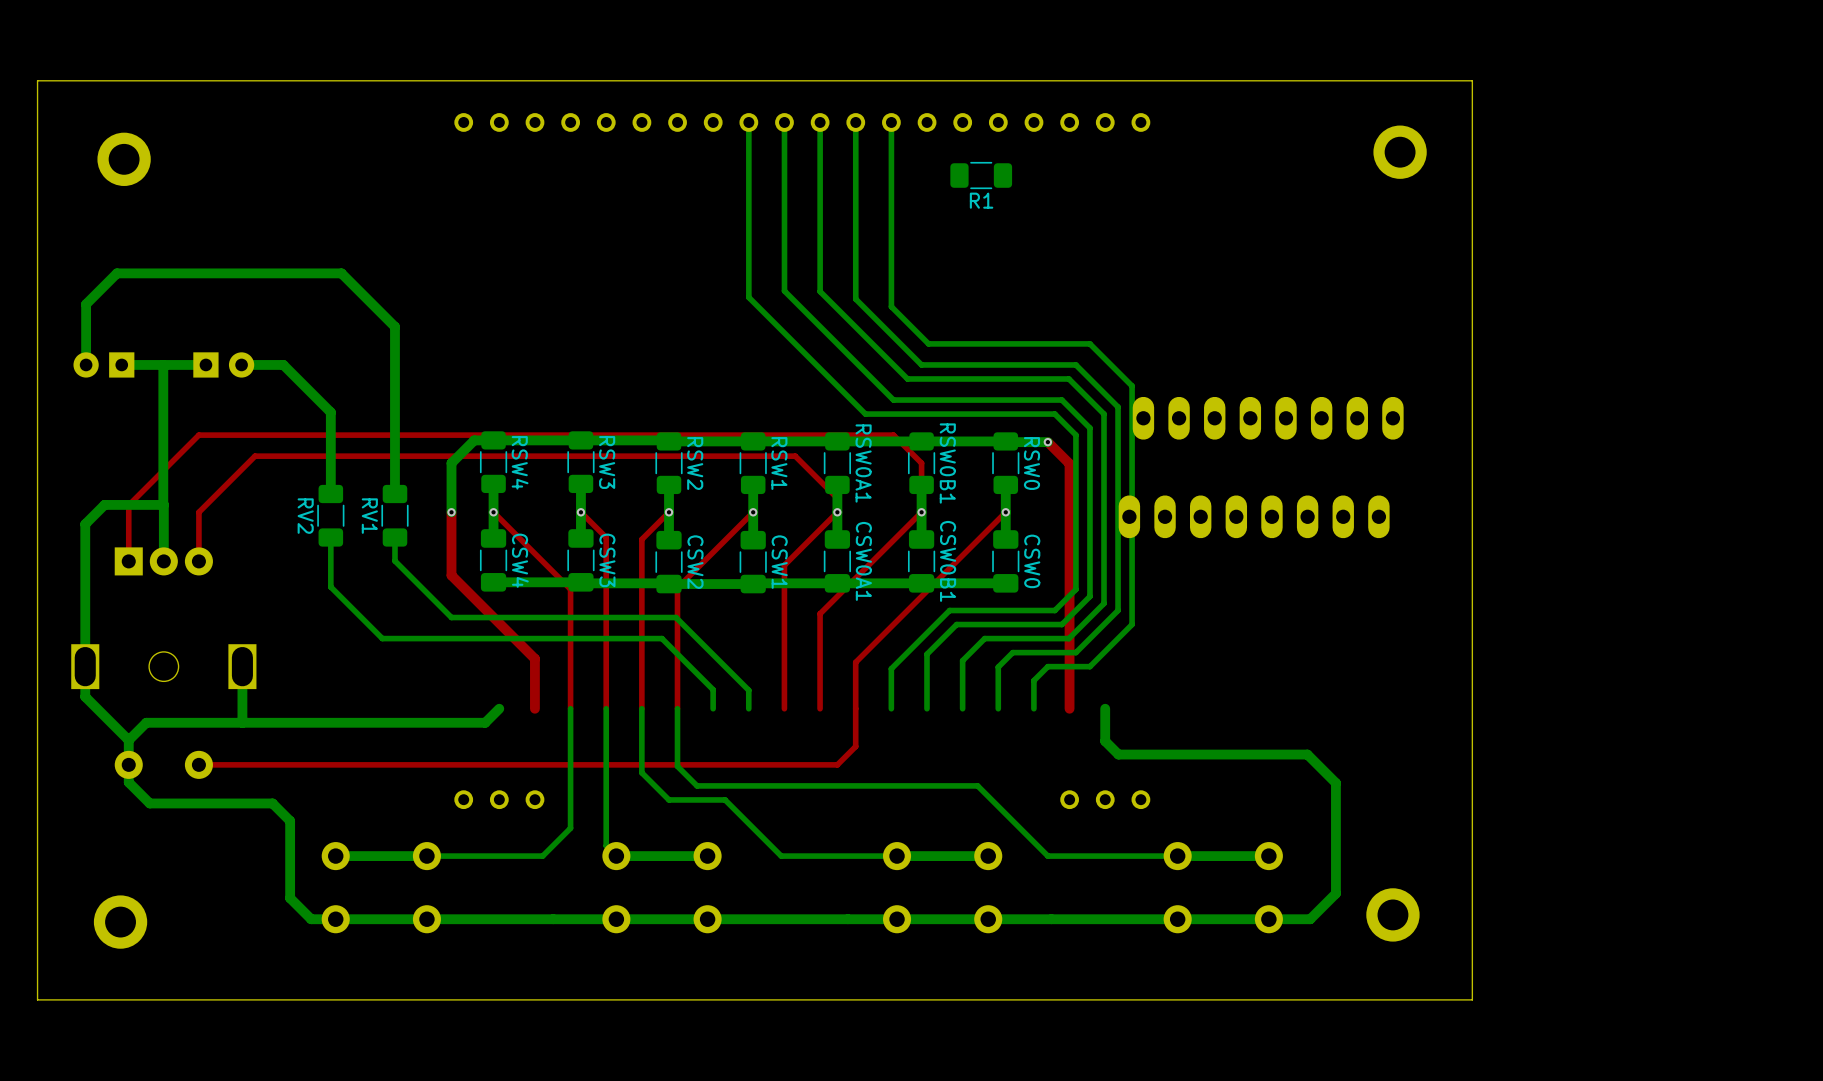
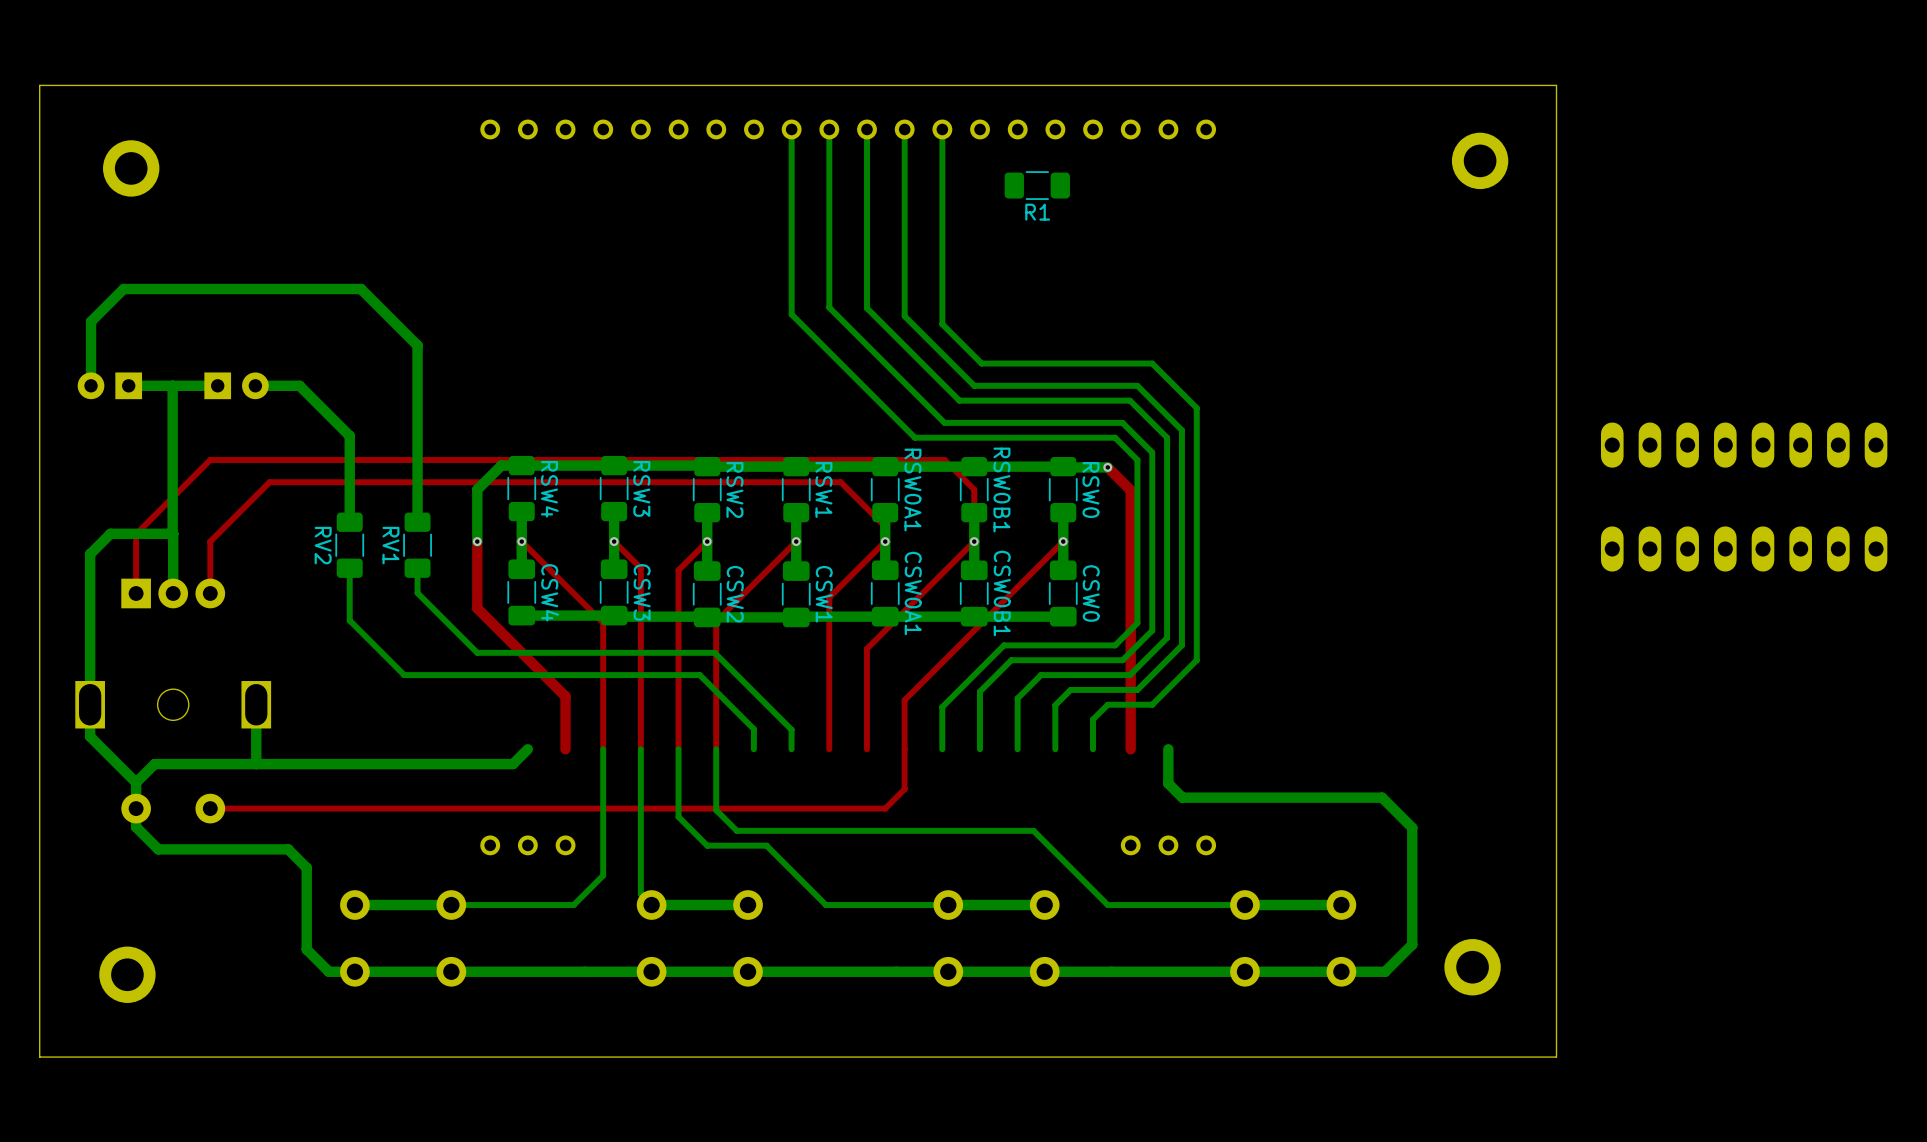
part: (1268, 418) -> none
part: none -> (1744, 445)
part: (1254, 516) -> none
part: none -> (1744, 548)

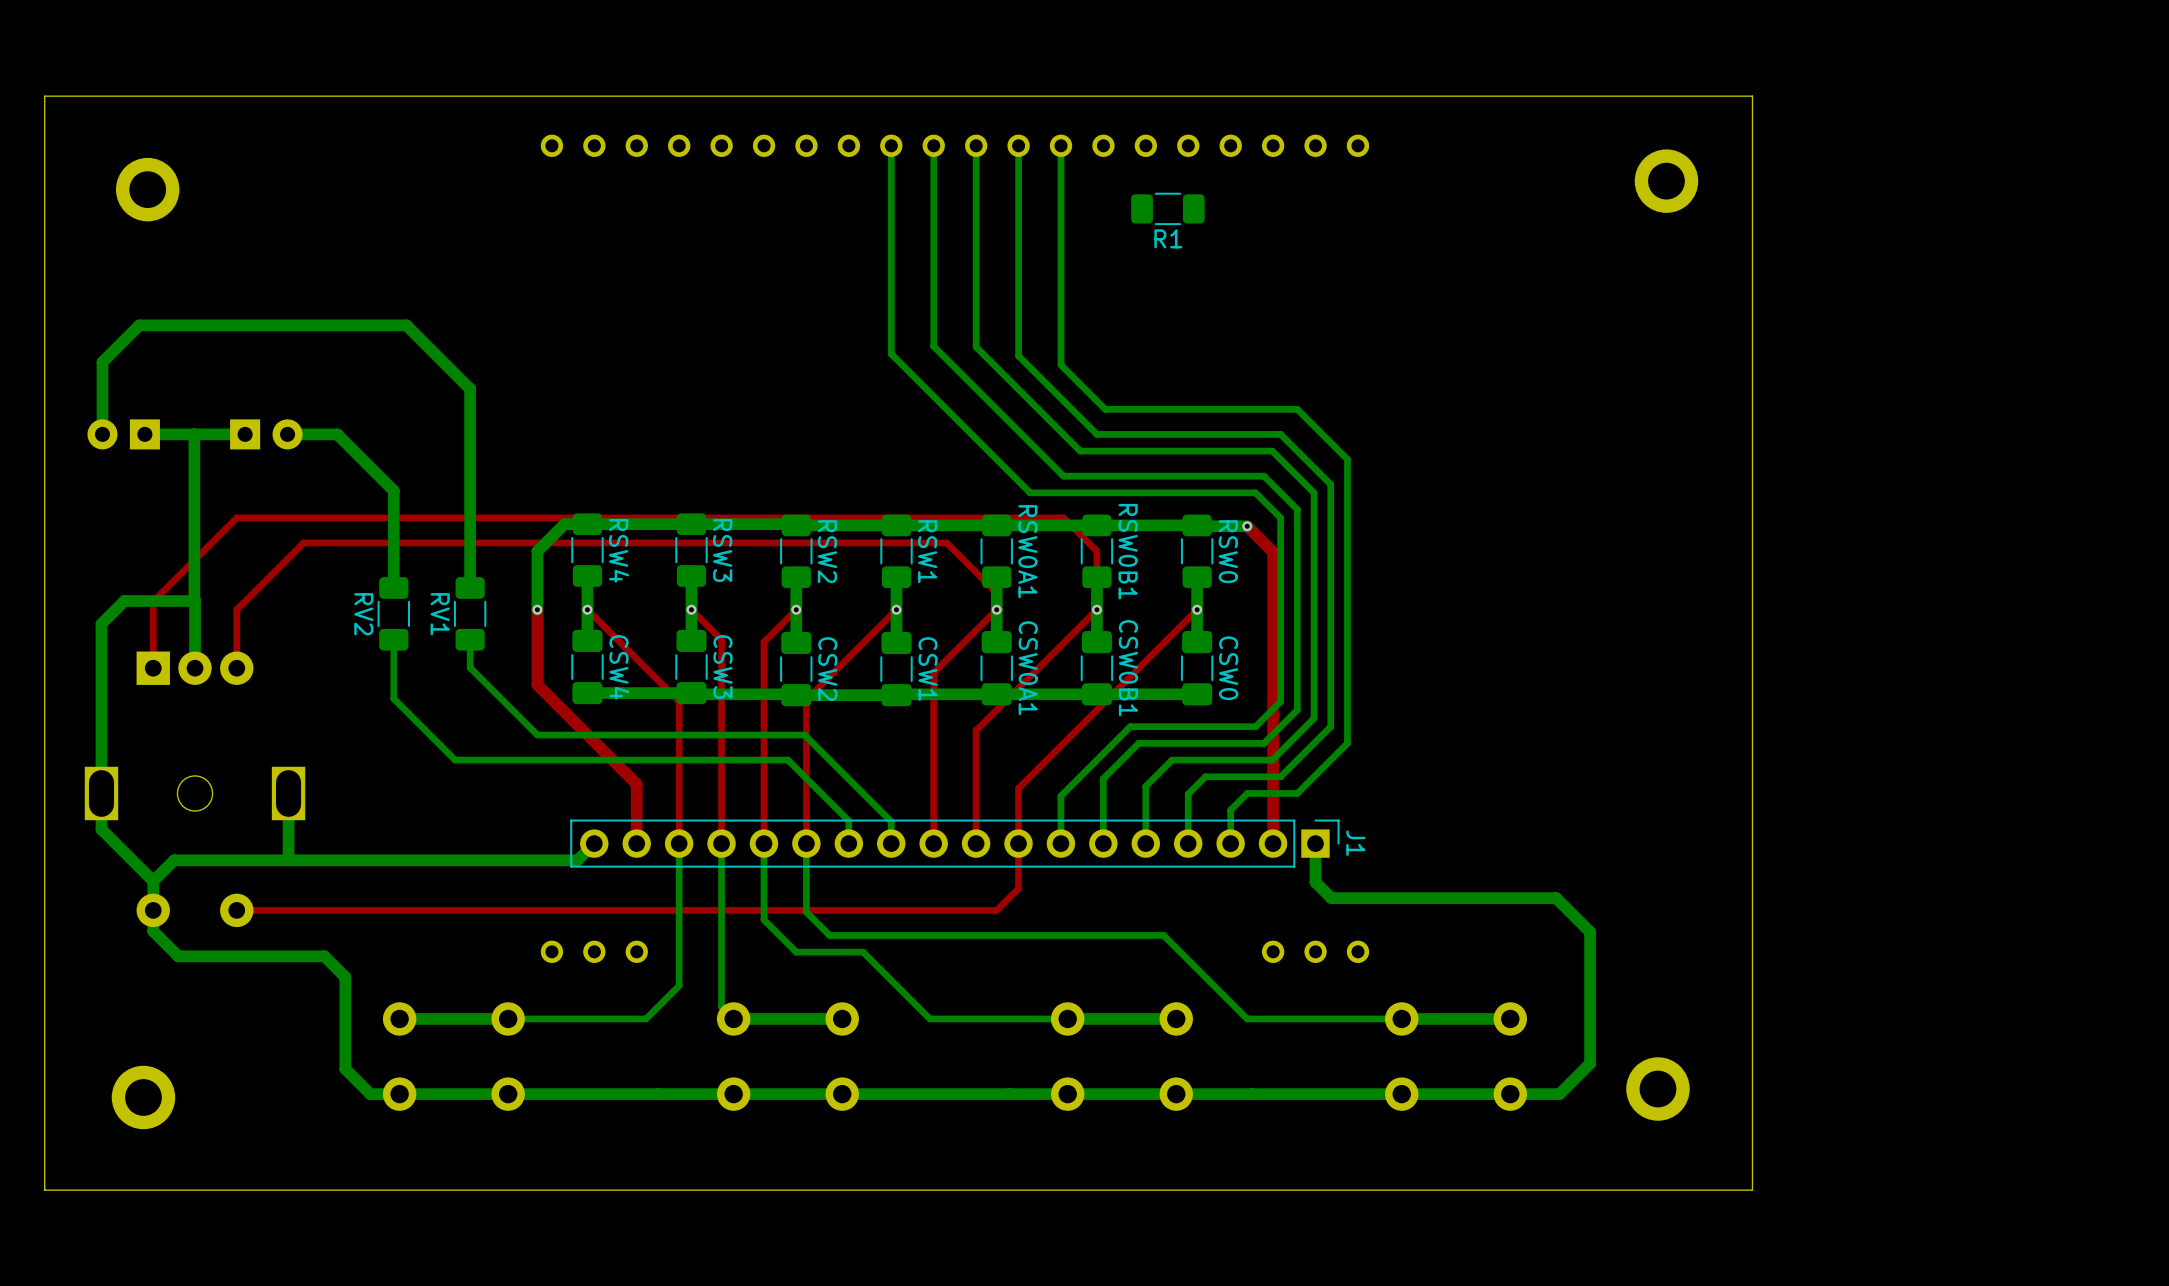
part: (1744, 445) -> none
part: (1744, 548) -> none
J1: none -> (954, 843)

